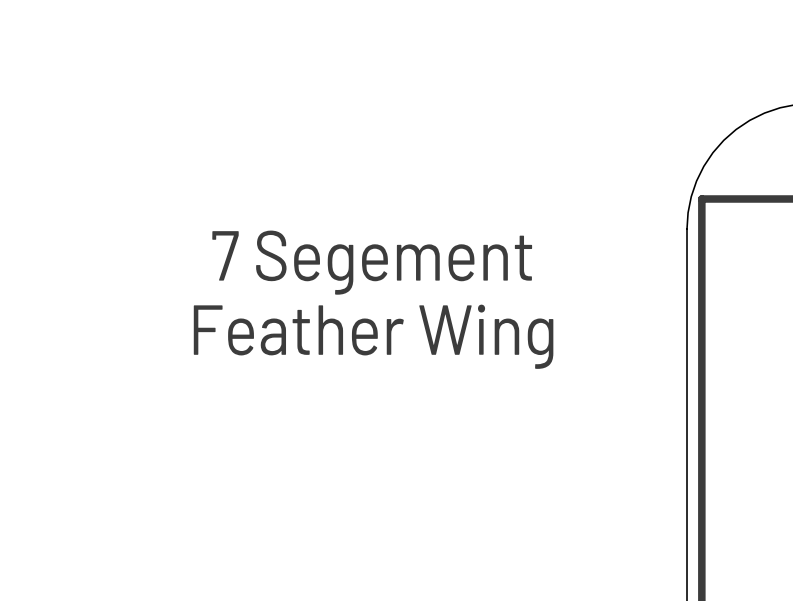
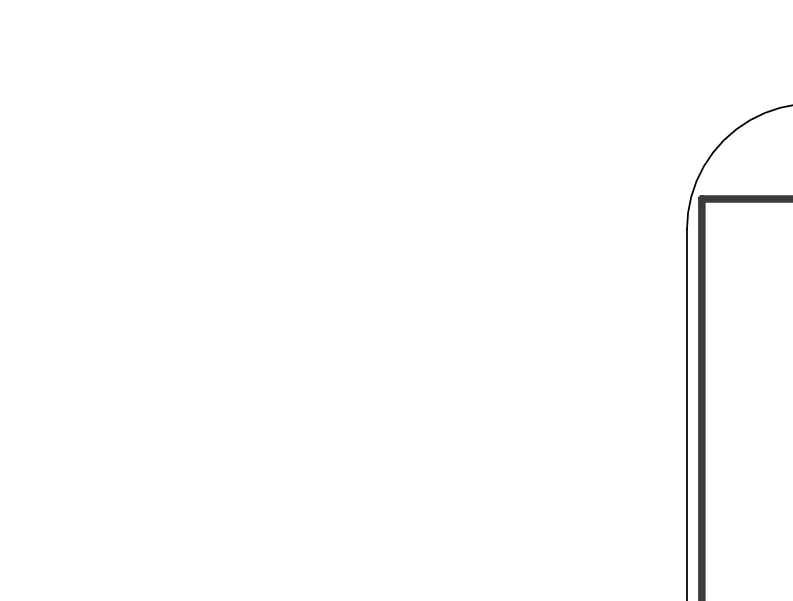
text: 7 Segement (372, 262) -> none
text: Feather Wing (373, 336) -> none

